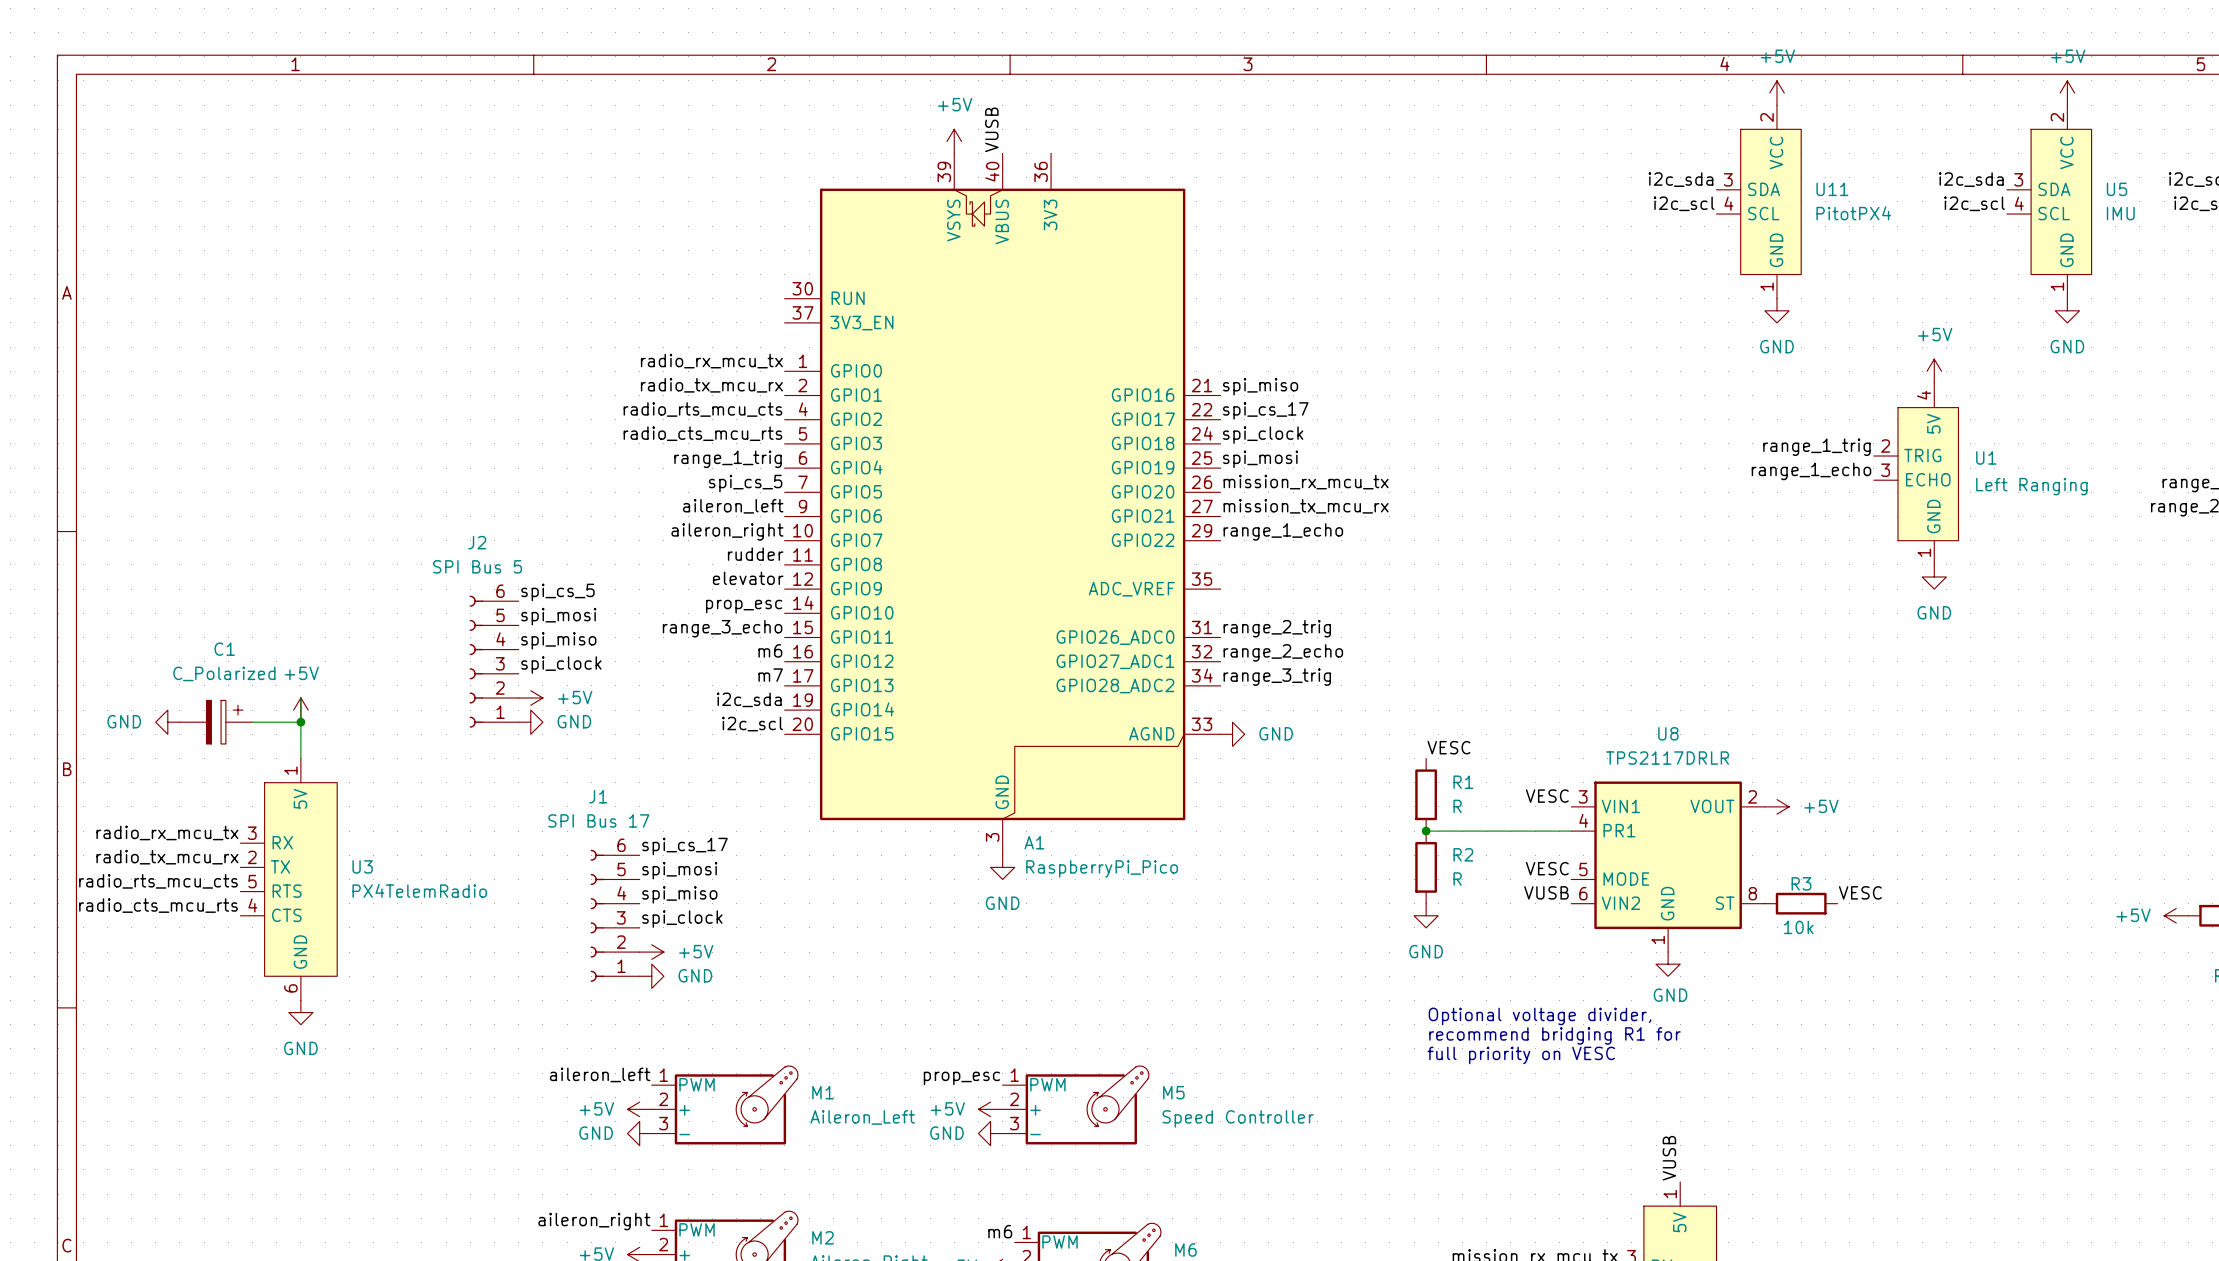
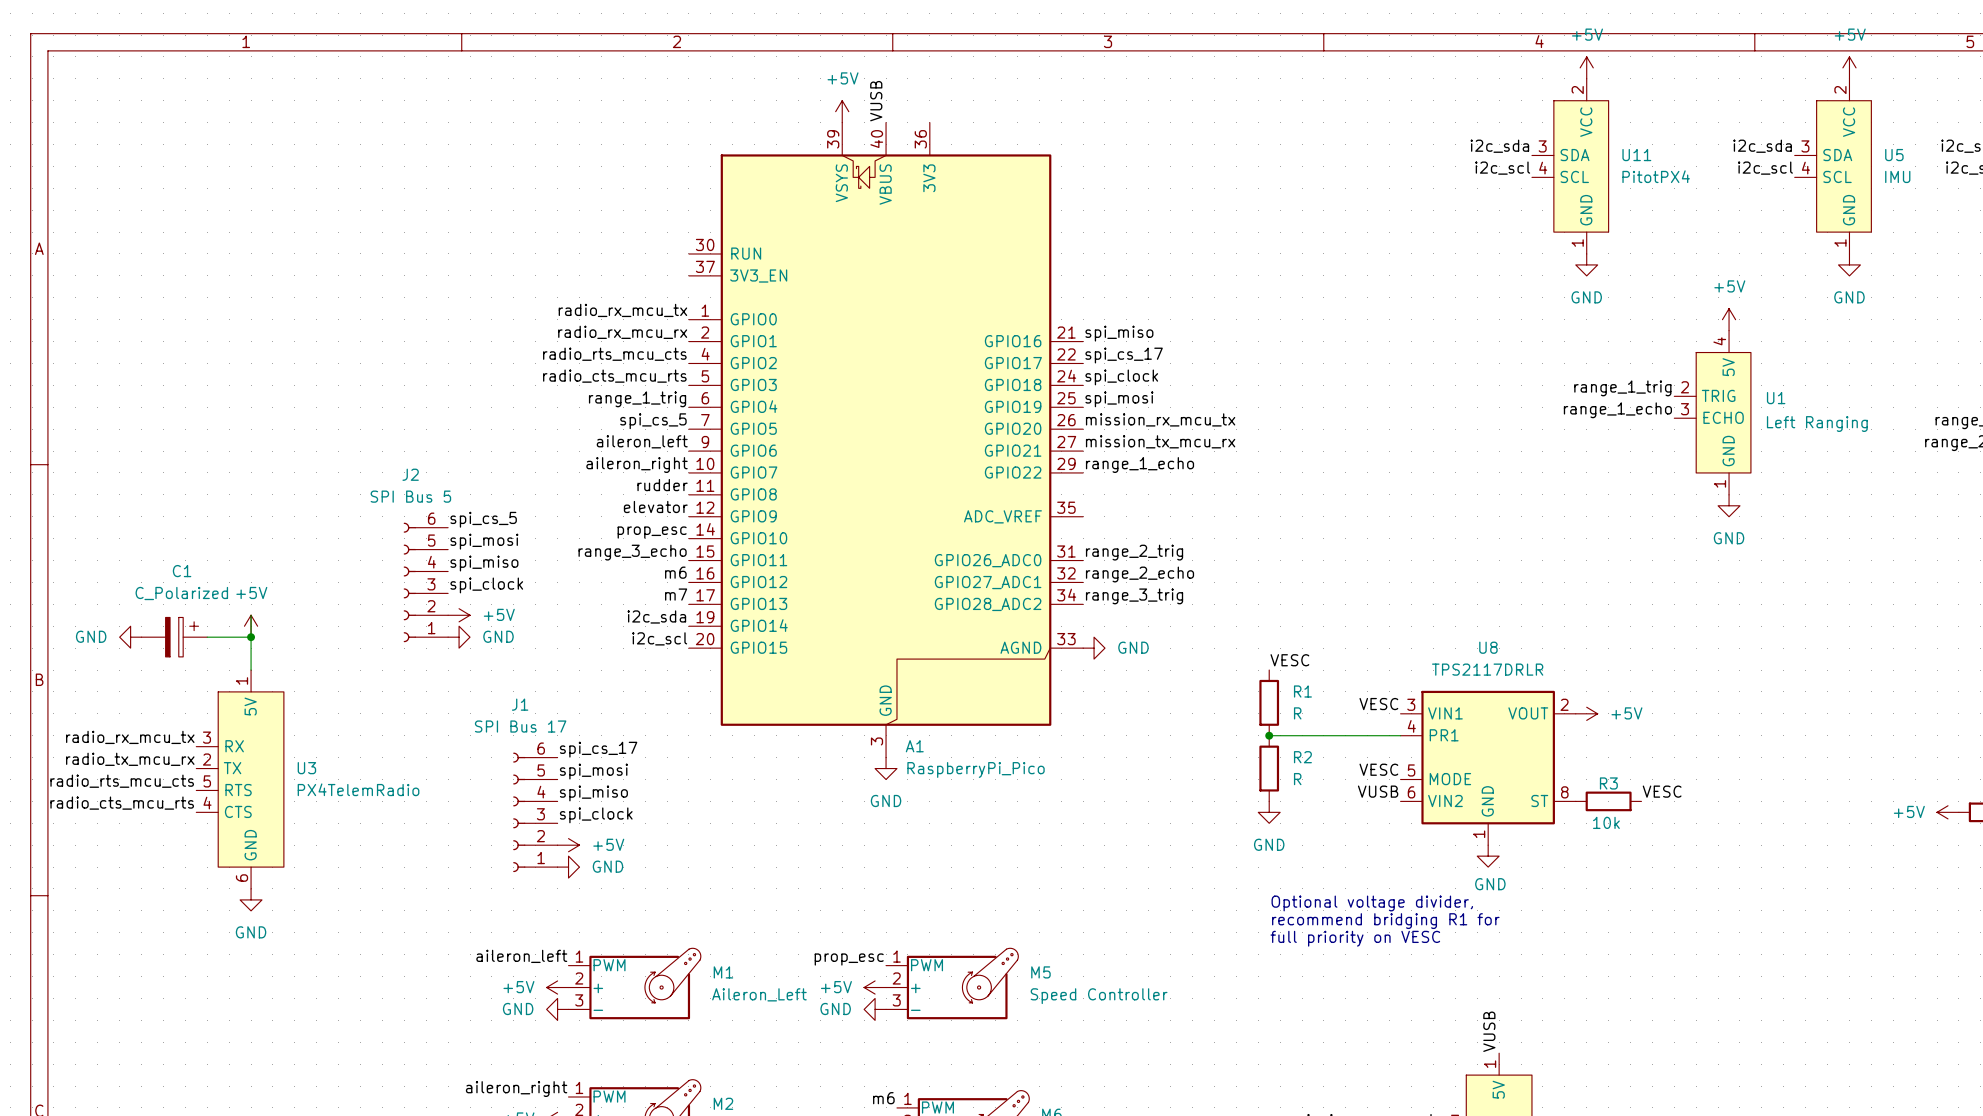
label: radio_tx_mcu_rx (711, 385) -> radio_rx_mcu_rx (622, 332)

